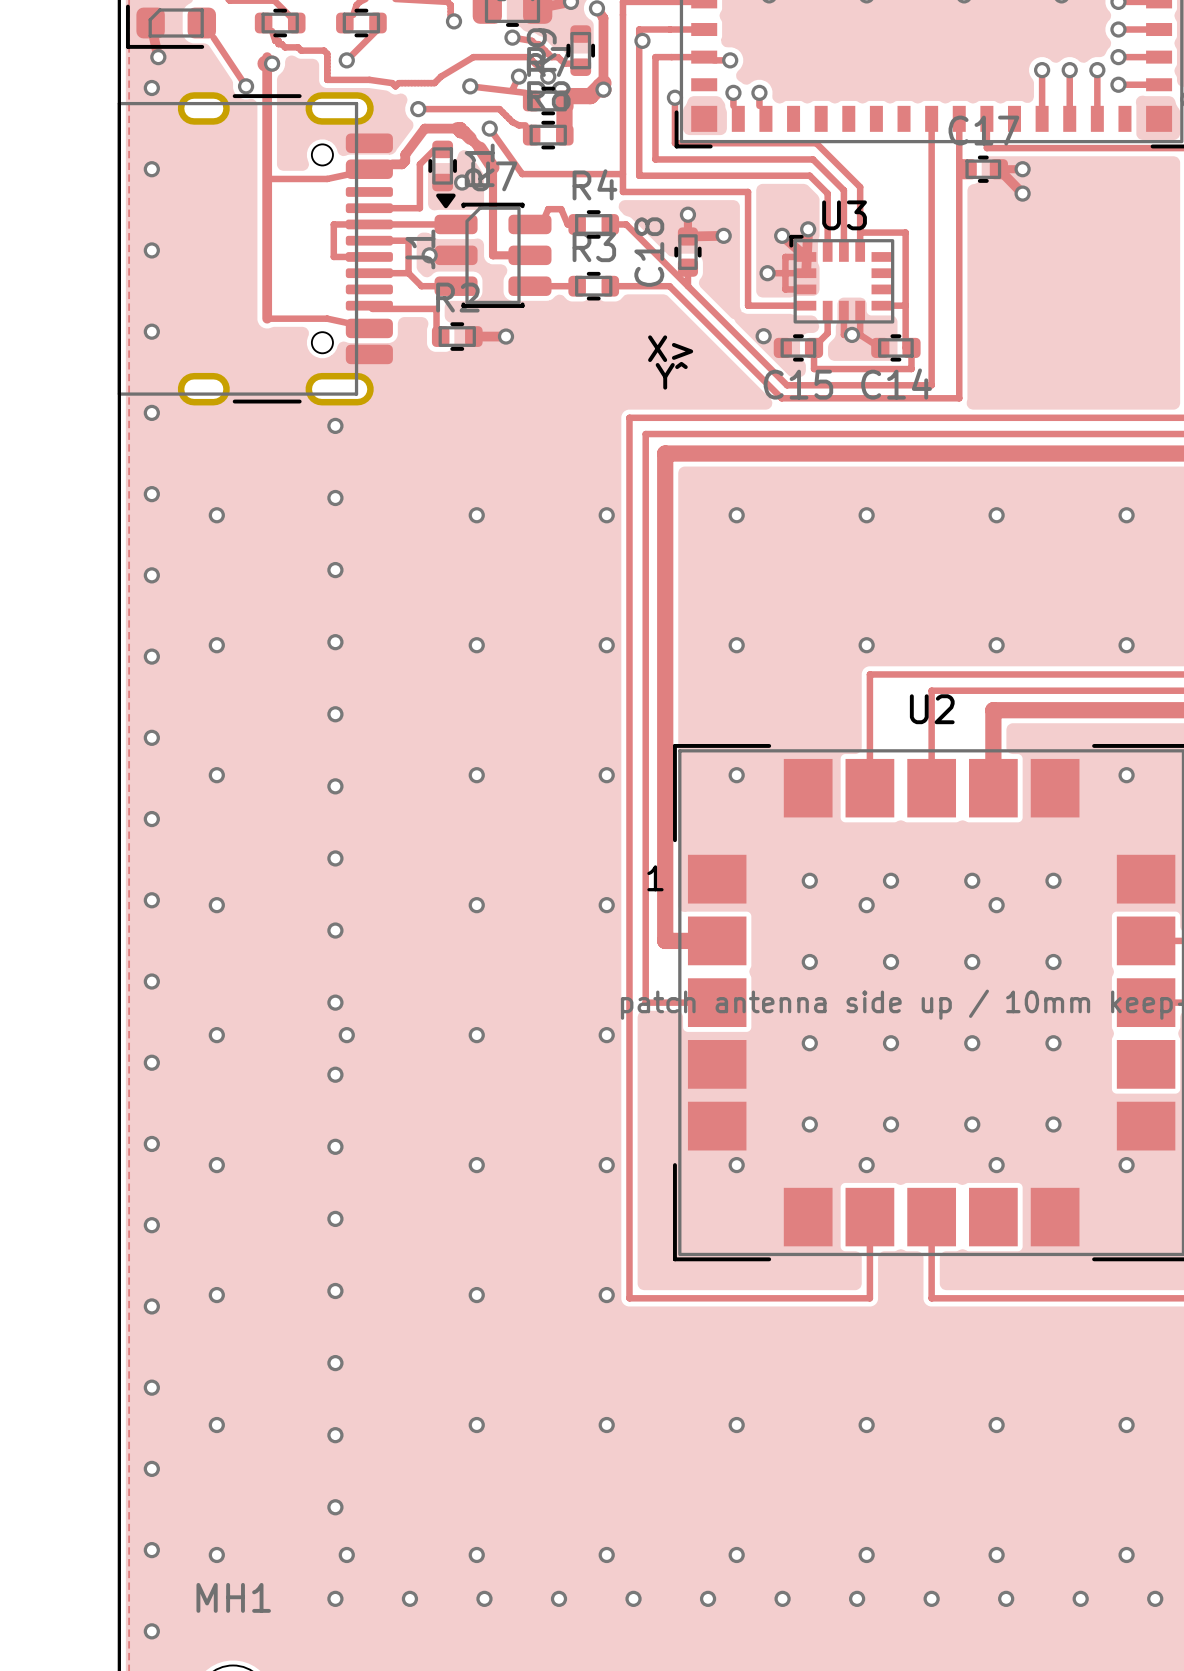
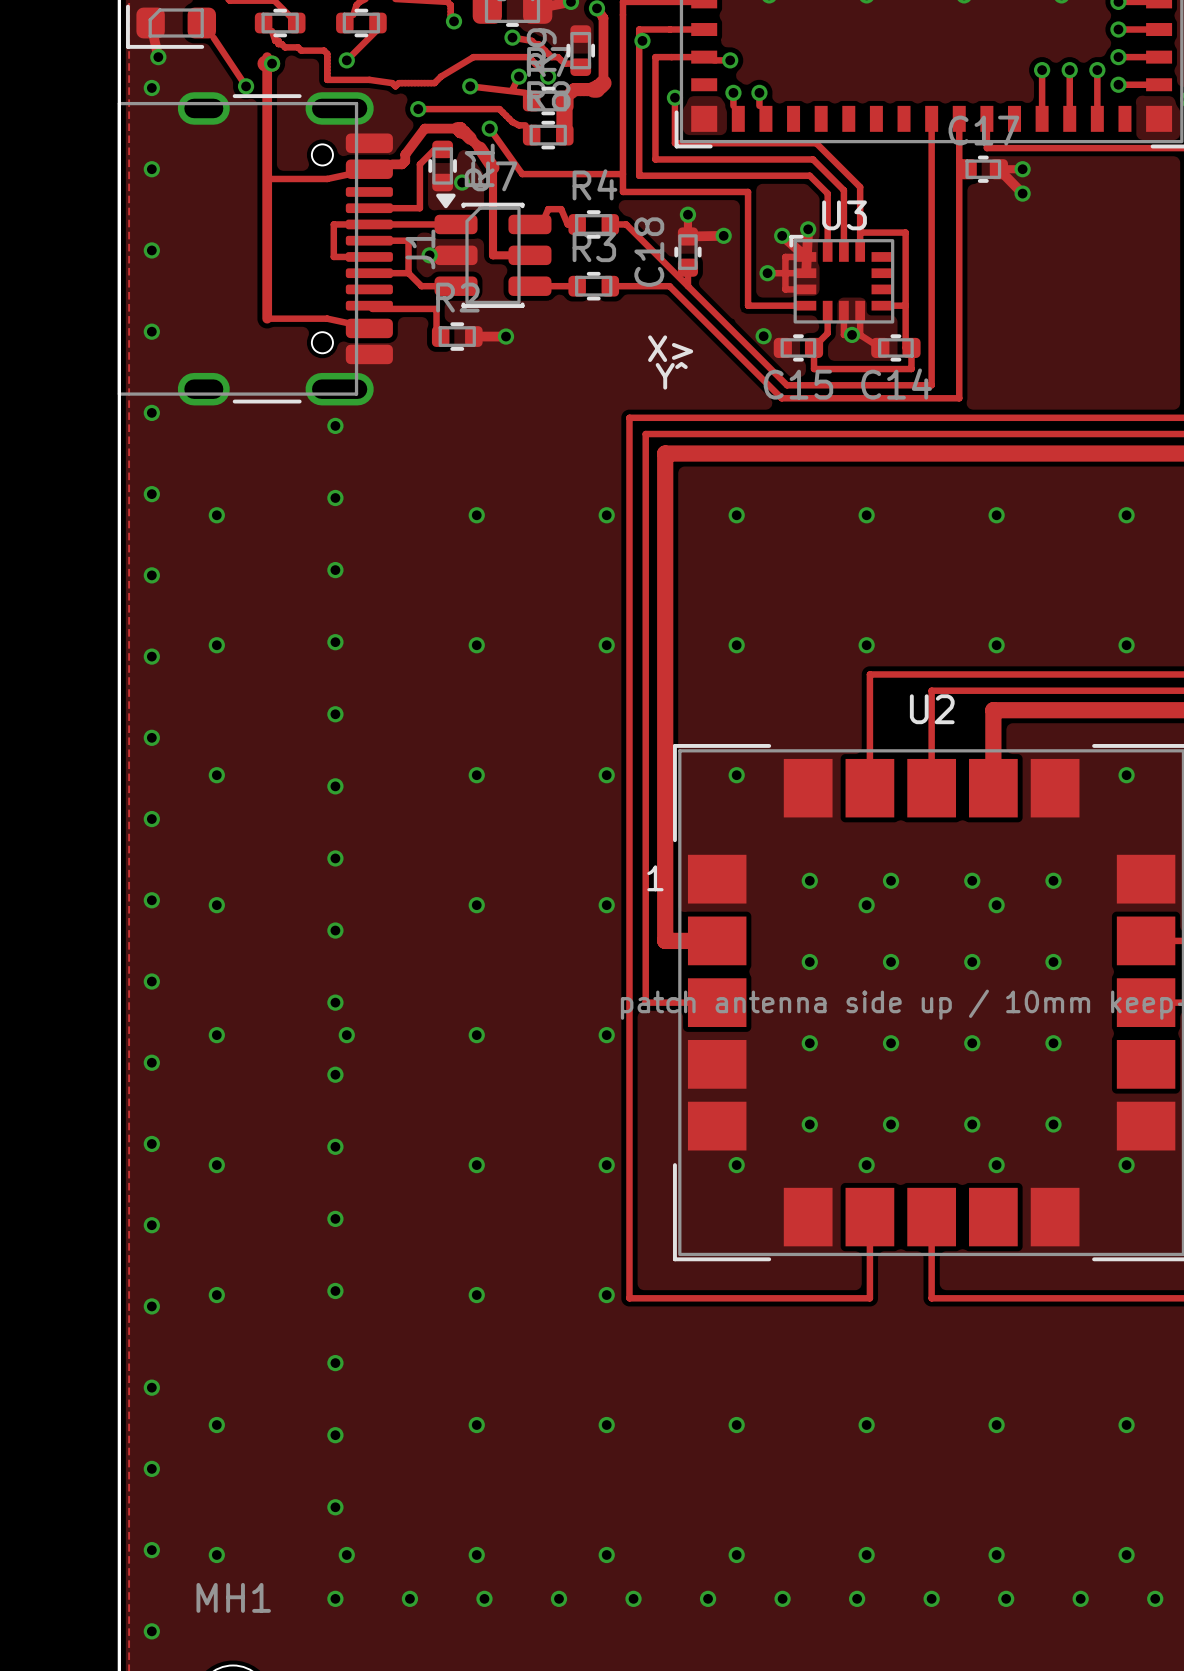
track: none -> (600, 86) (596, 86) (596, 89) (574, 89) (570, 92)
track: (603, 89) (600, 86) (590, 96) (570, 96) -> none
via: (603, 89) -> none

